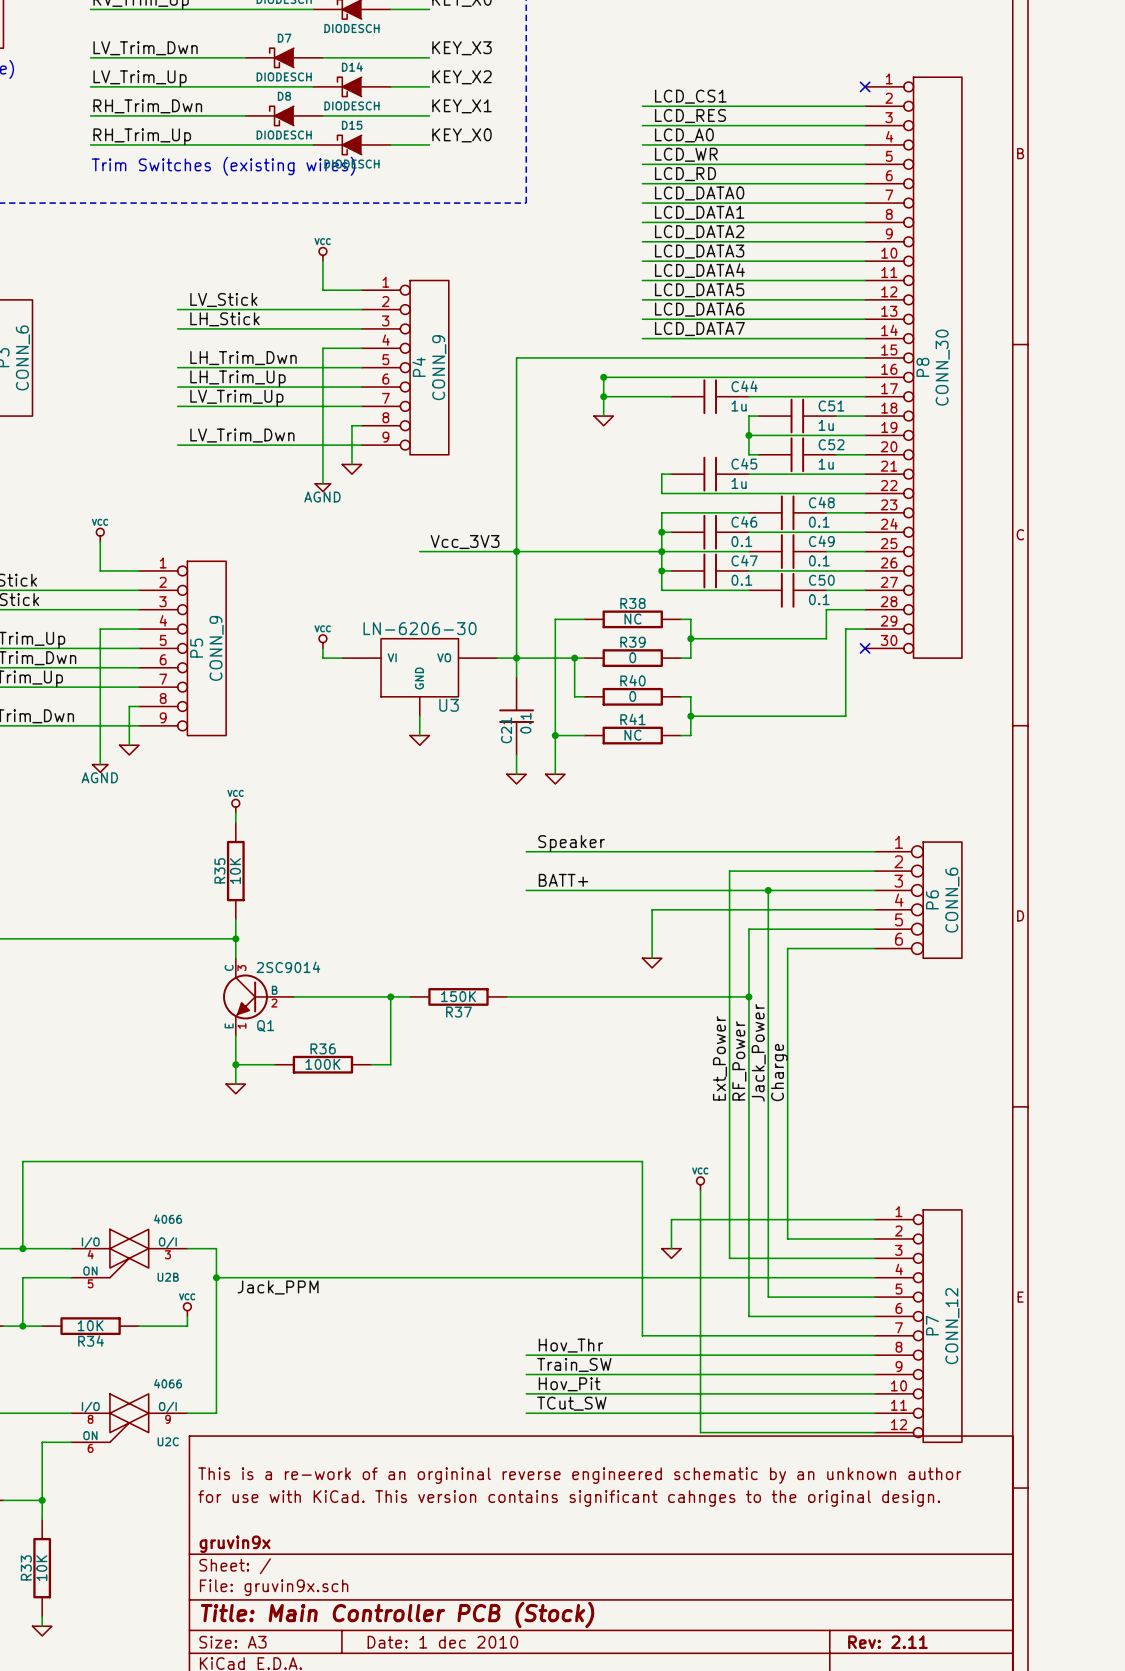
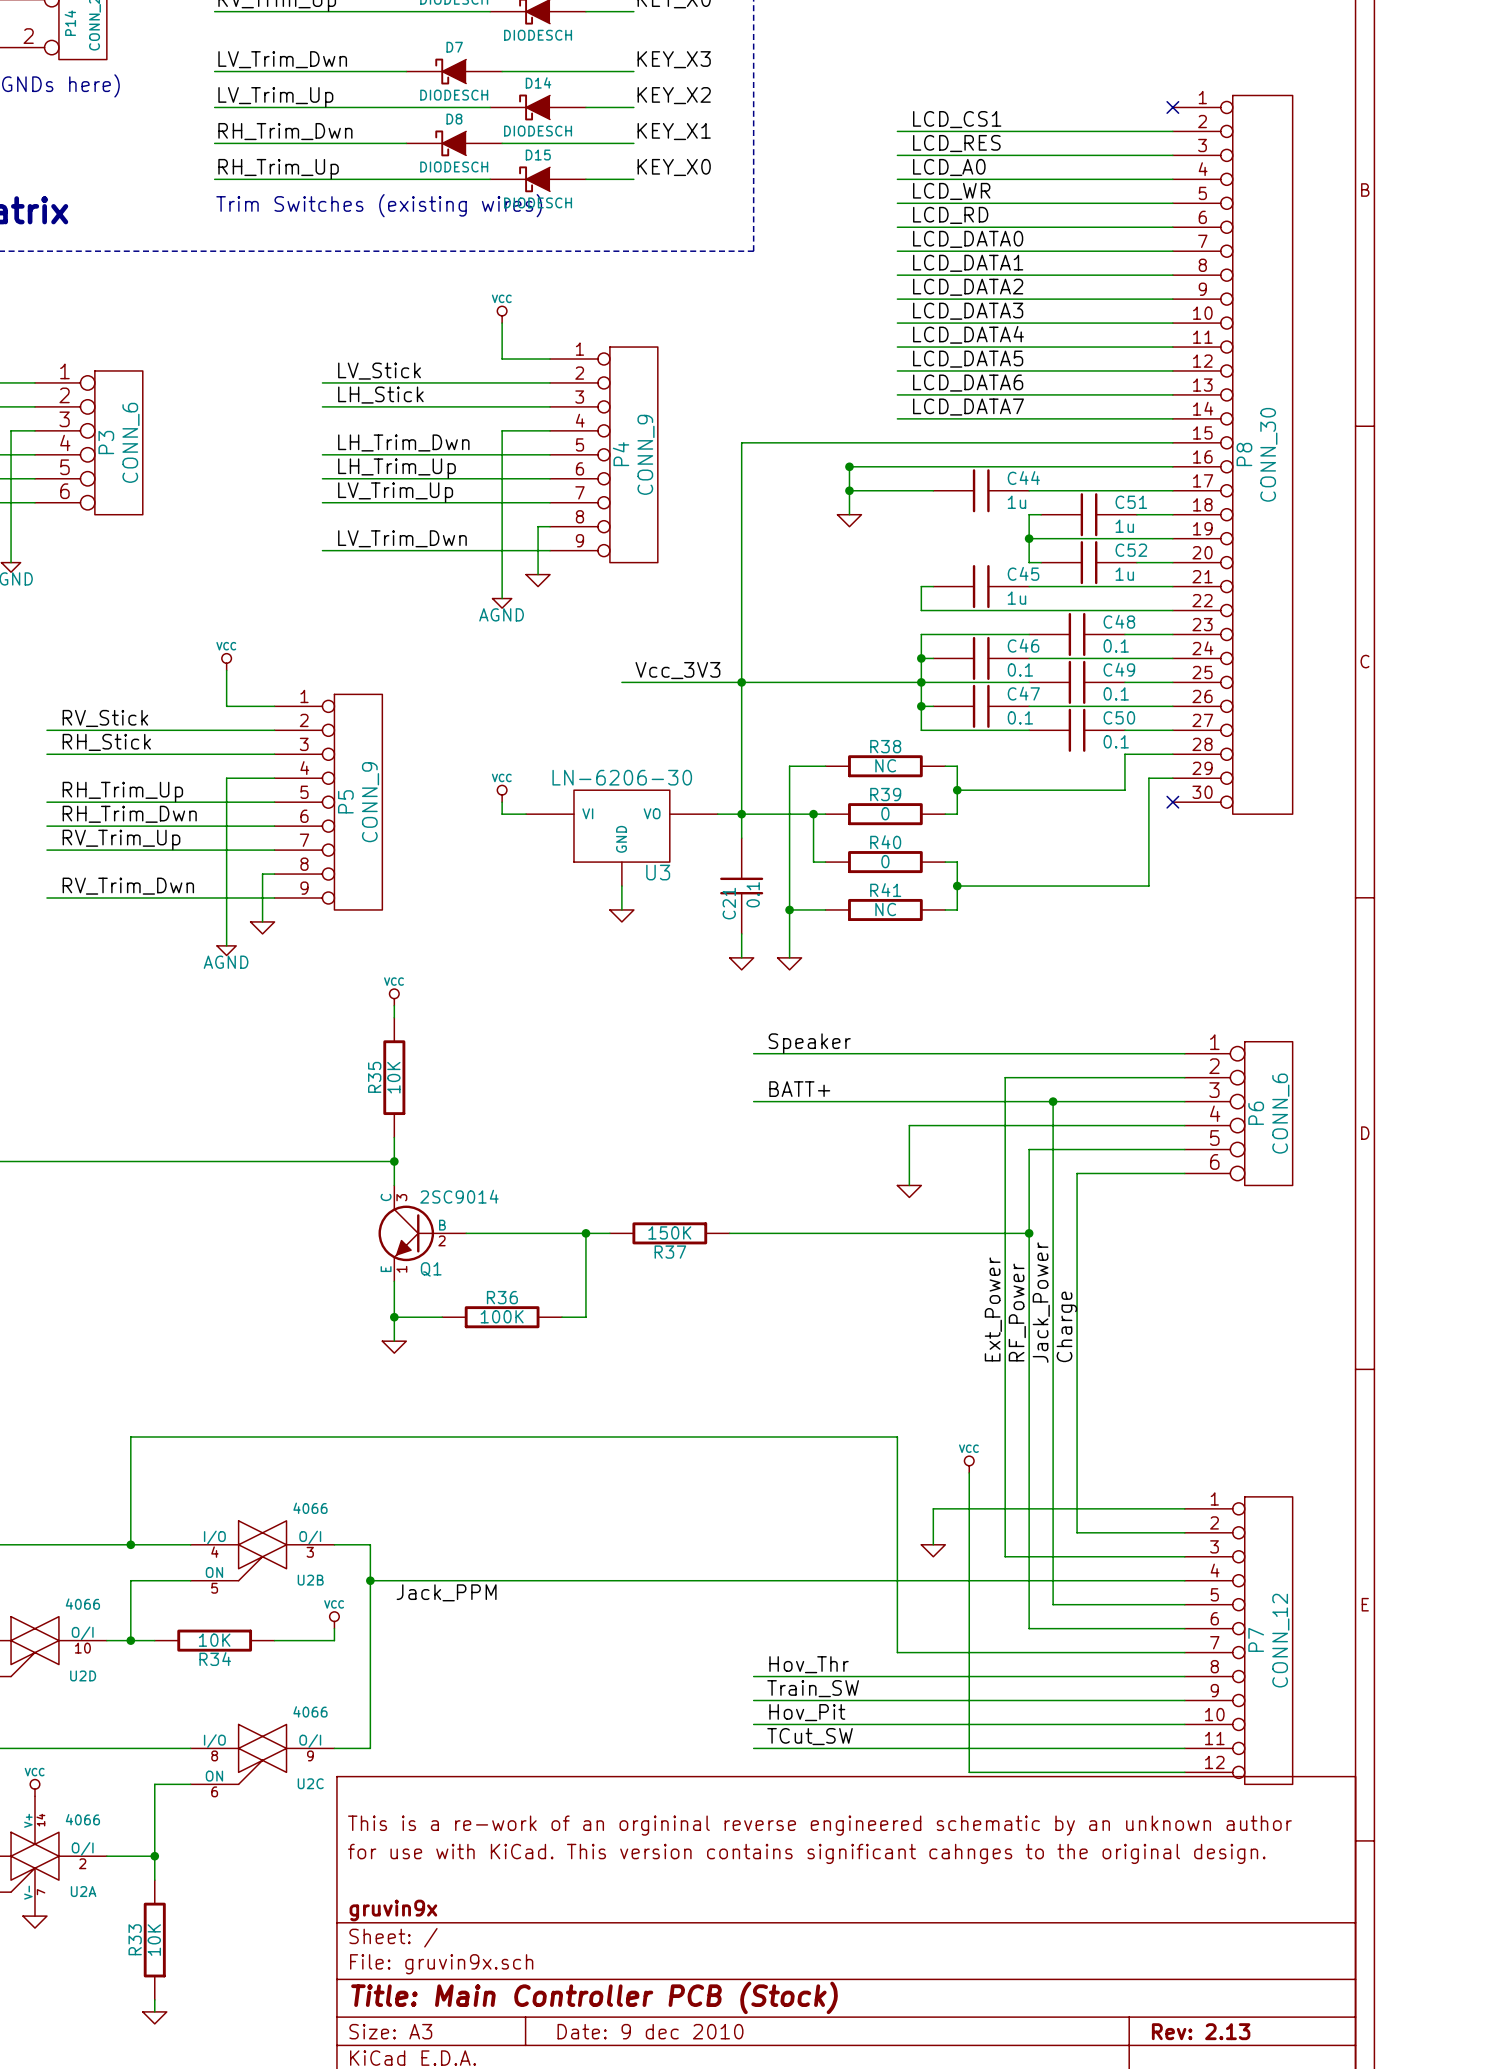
title block: Date: 1 dec 2010 (442, 1642) -> Date: 9 dec 2010 (650, 2031)
title block: Rev: 2.11 (887, 1642) -> Rev: 2.13 (1201, 2031)

